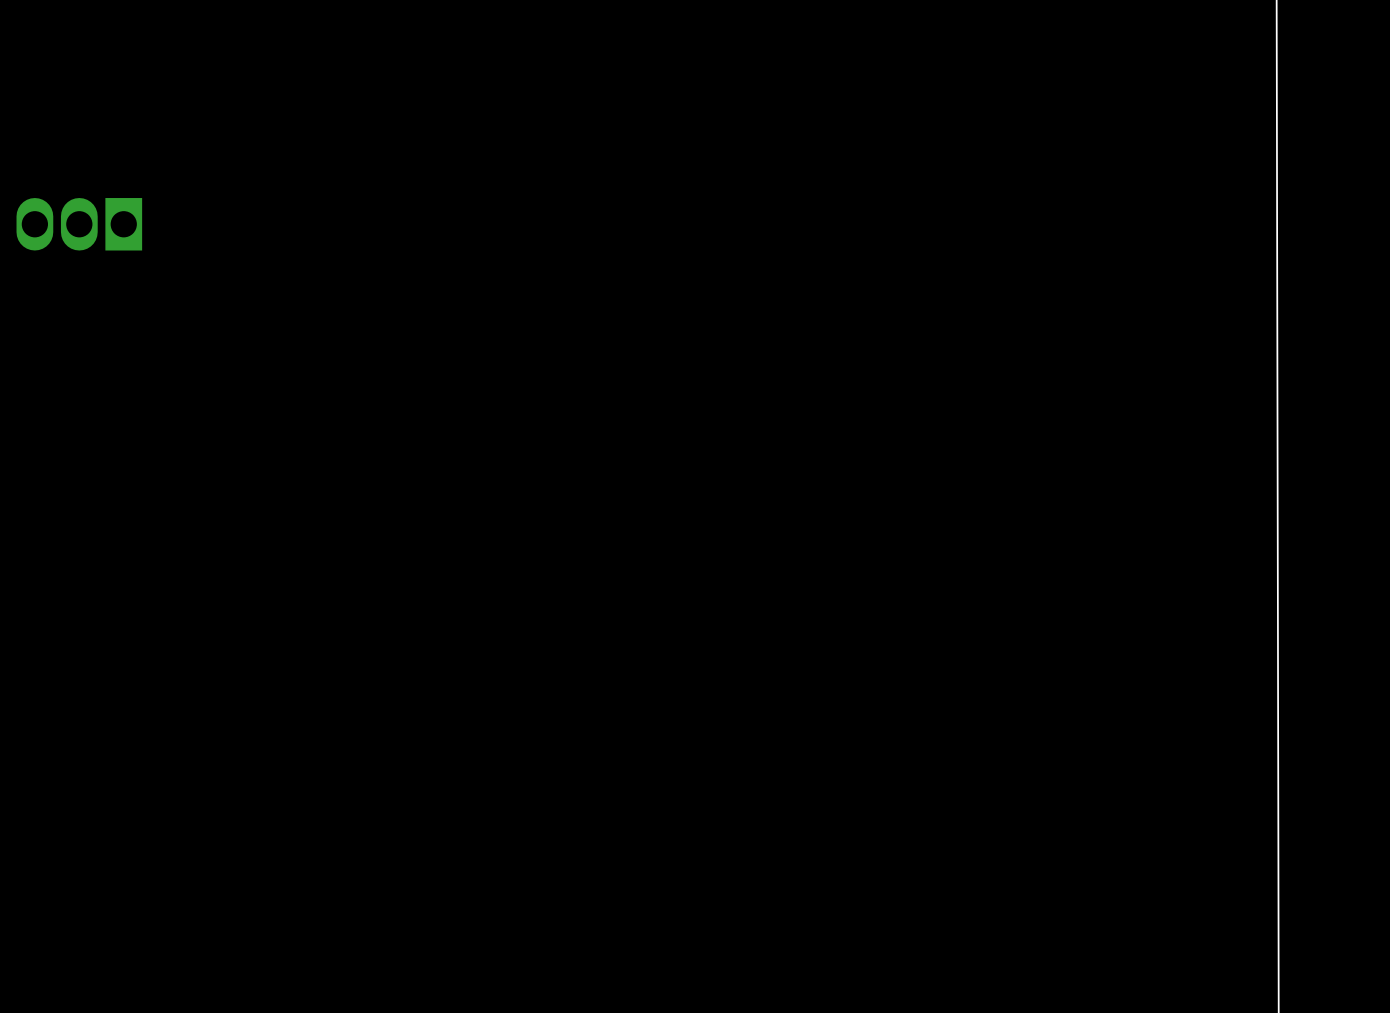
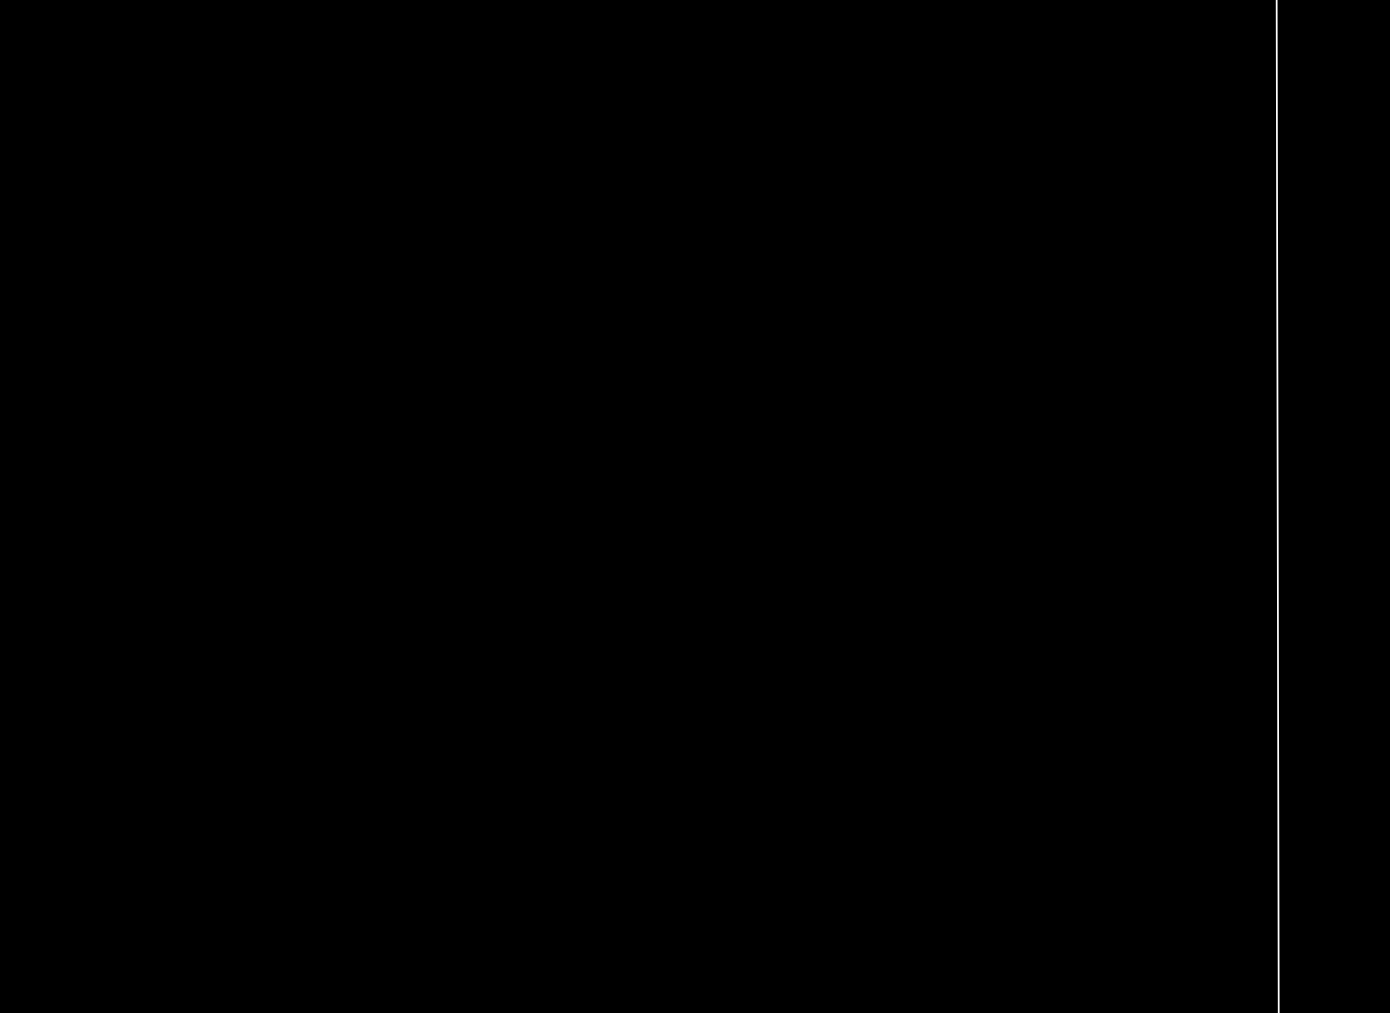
part: (79, 224) -> none

